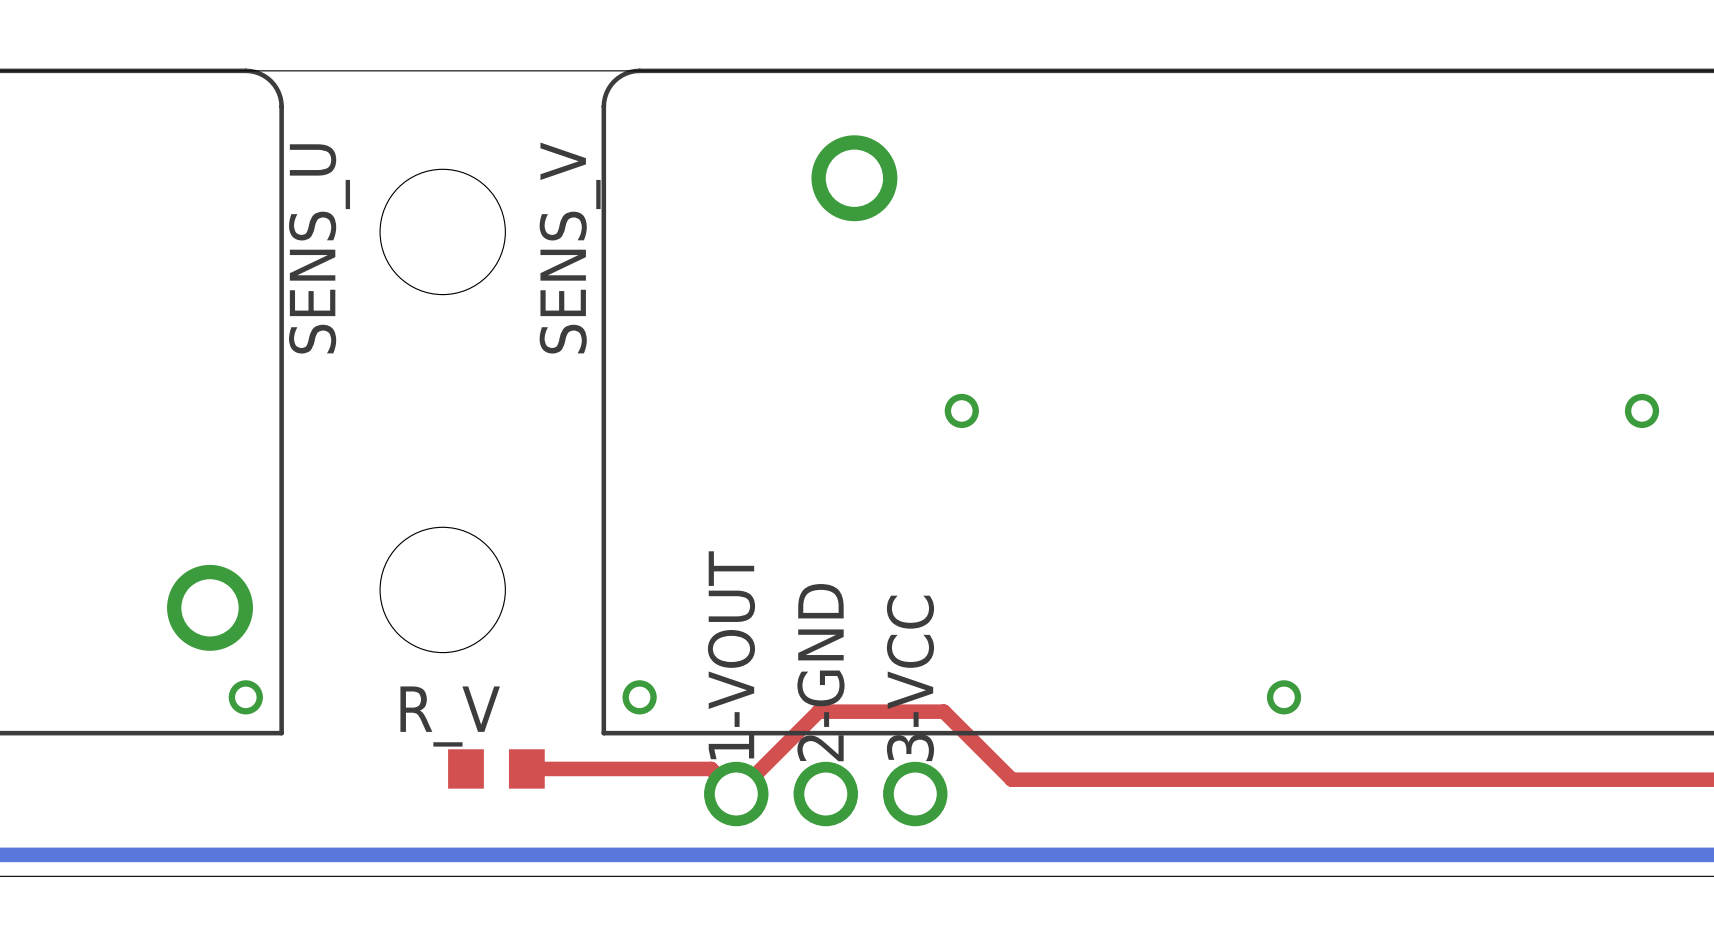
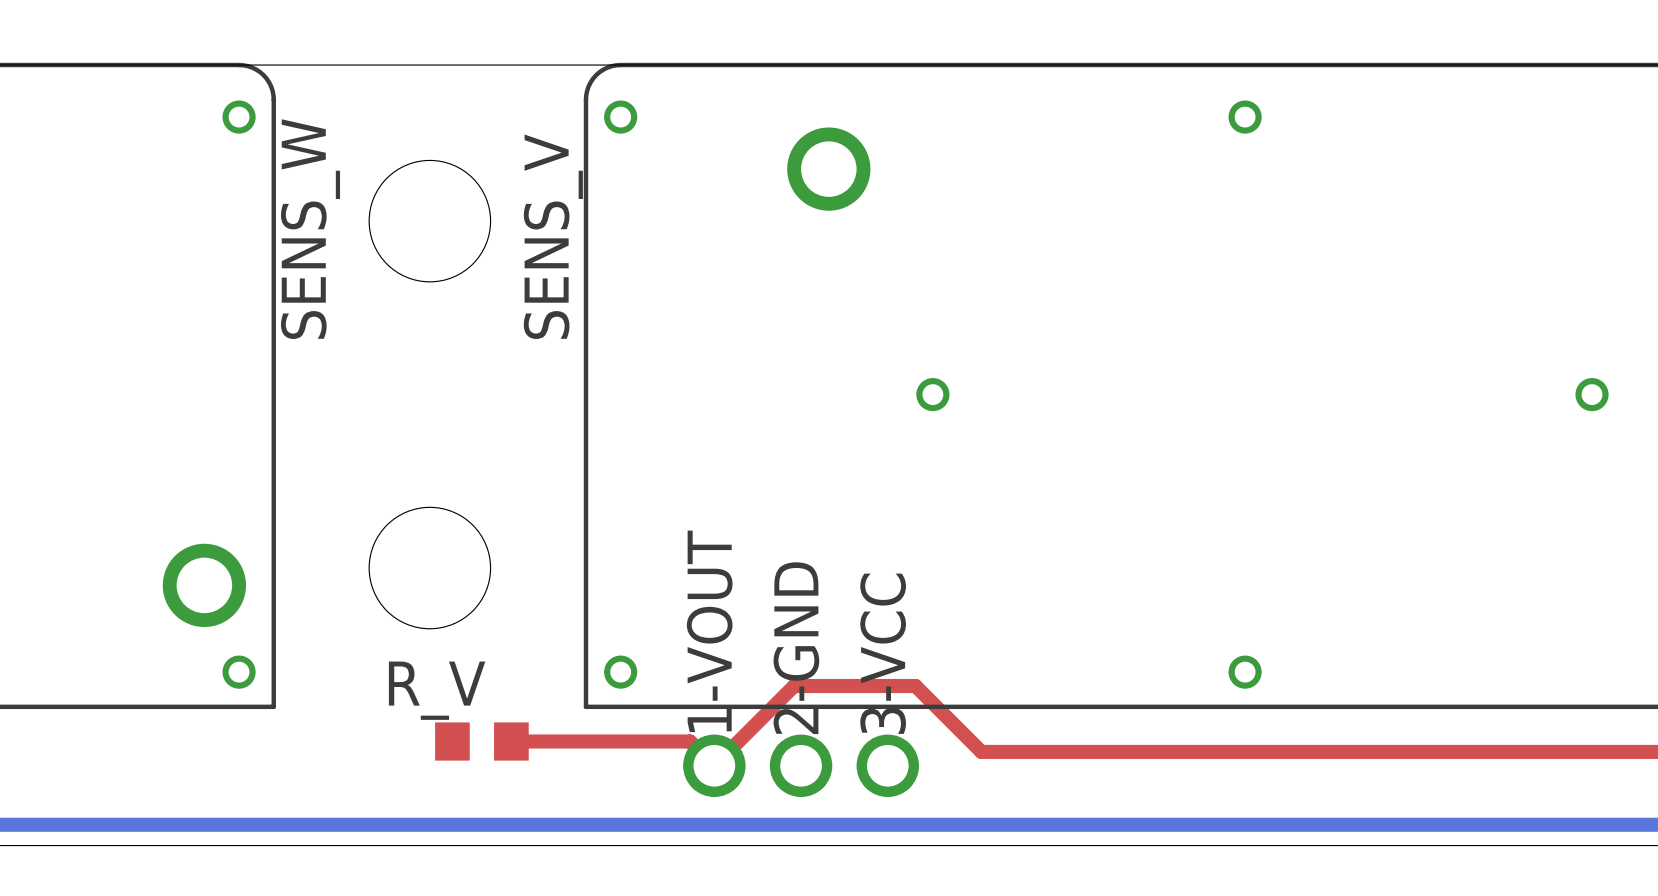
via: none -> (239, 117)
via: none -> (620, 117)
via: none -> (1245, 117)
SENS_U name: SENS_U (319, 248) -> SENS_W (310, 229)

